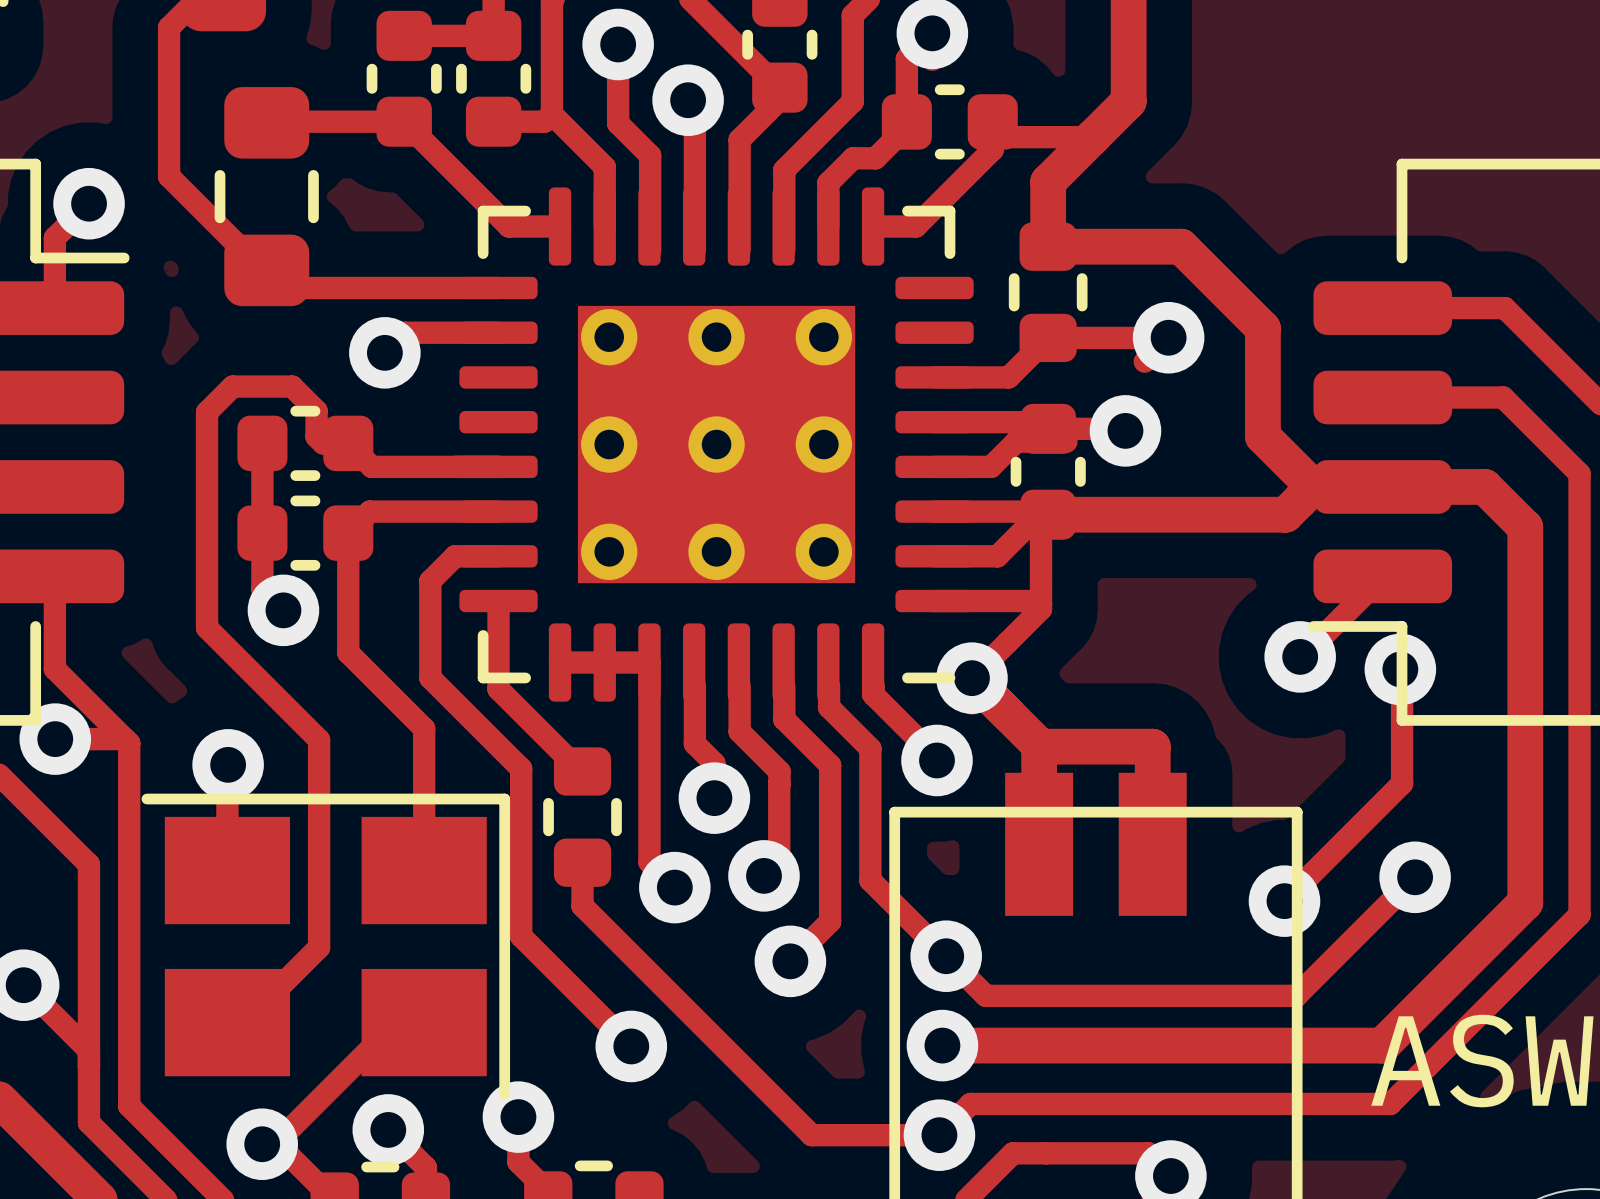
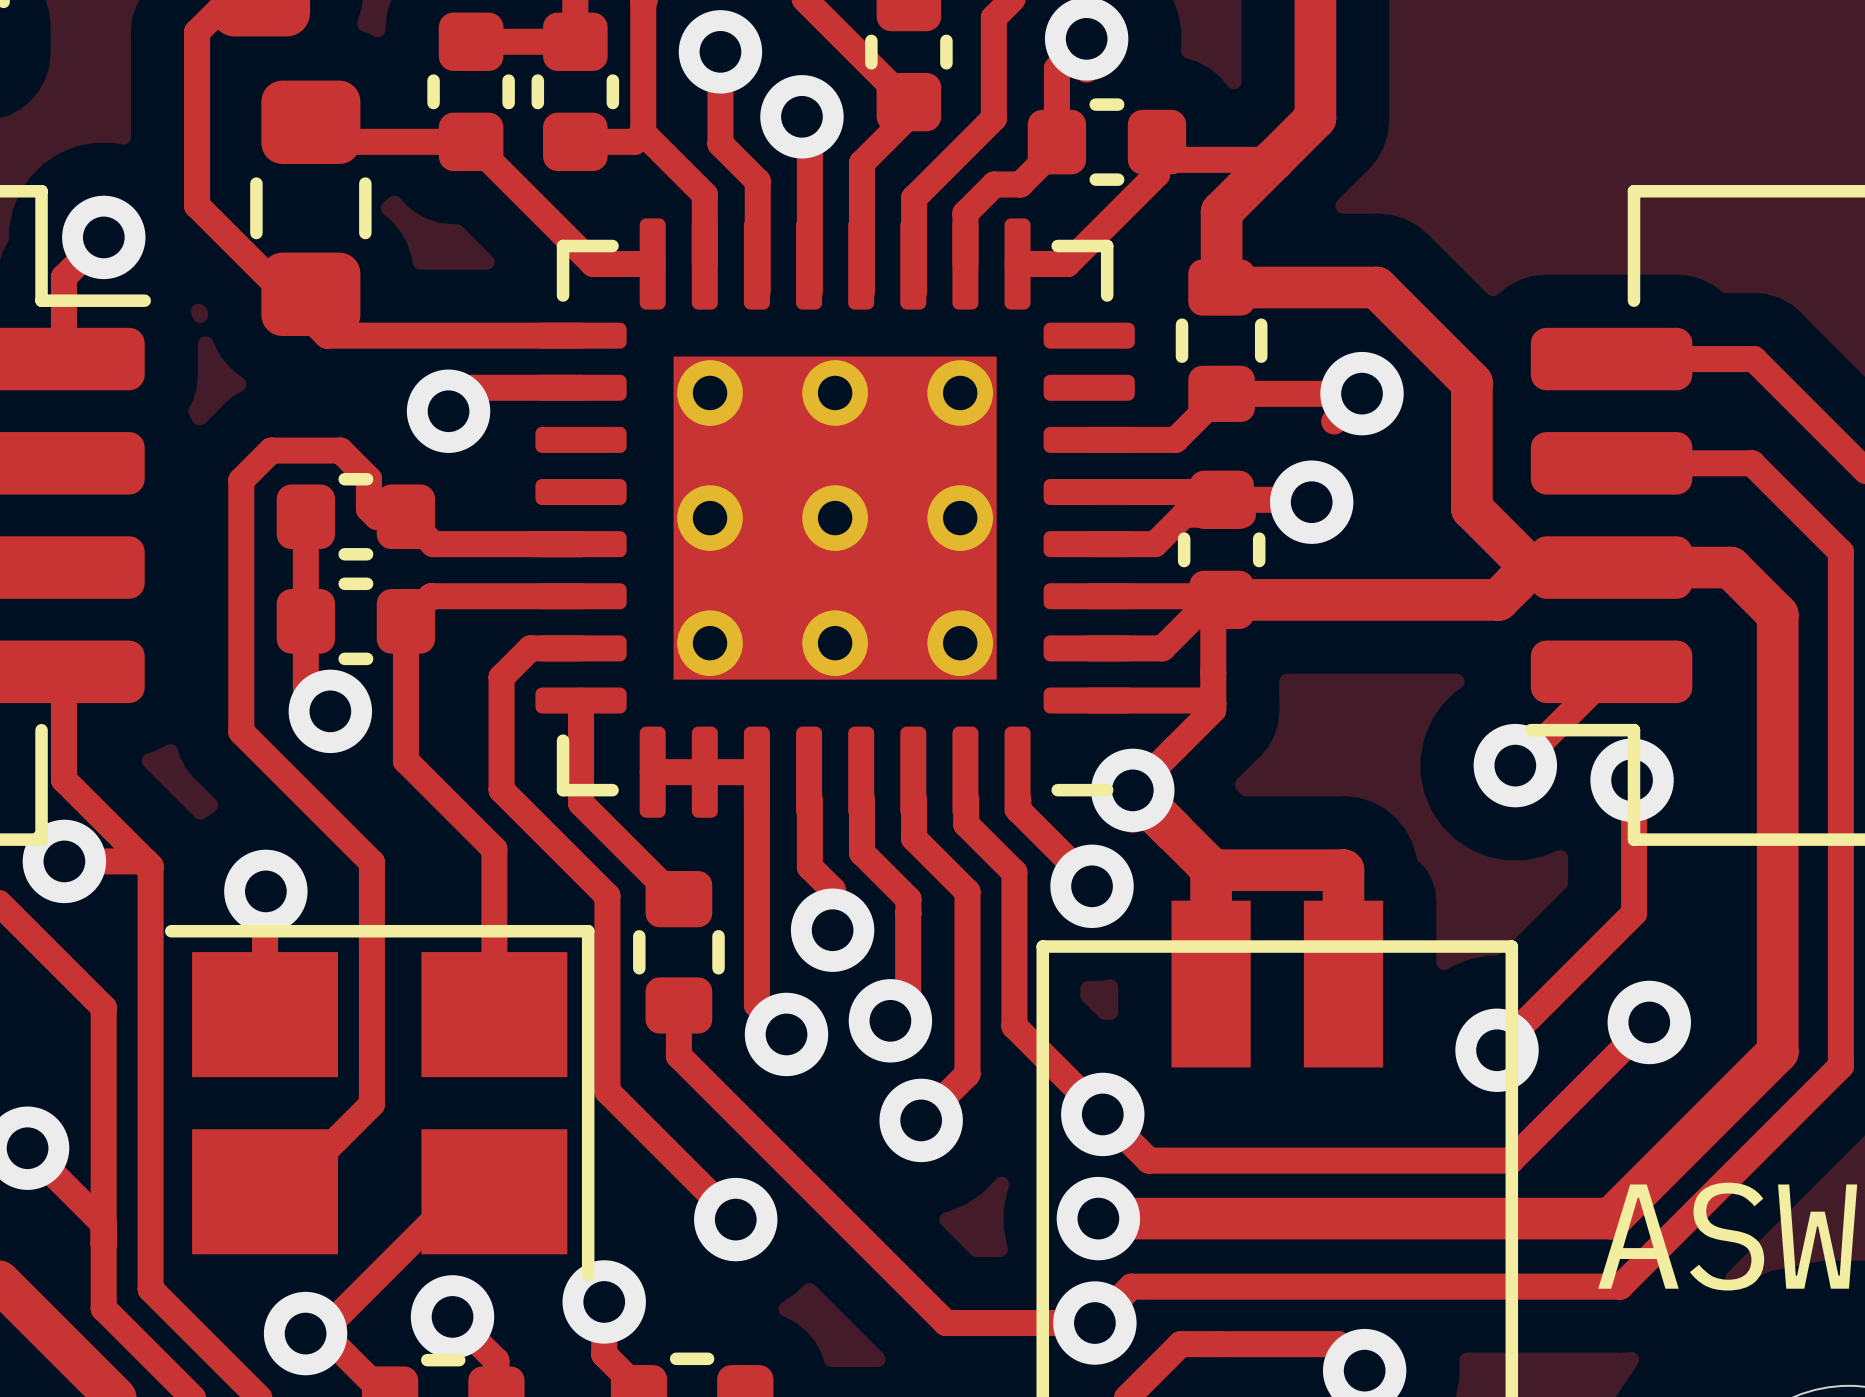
part position: (266, 196) -> (310, 208)

